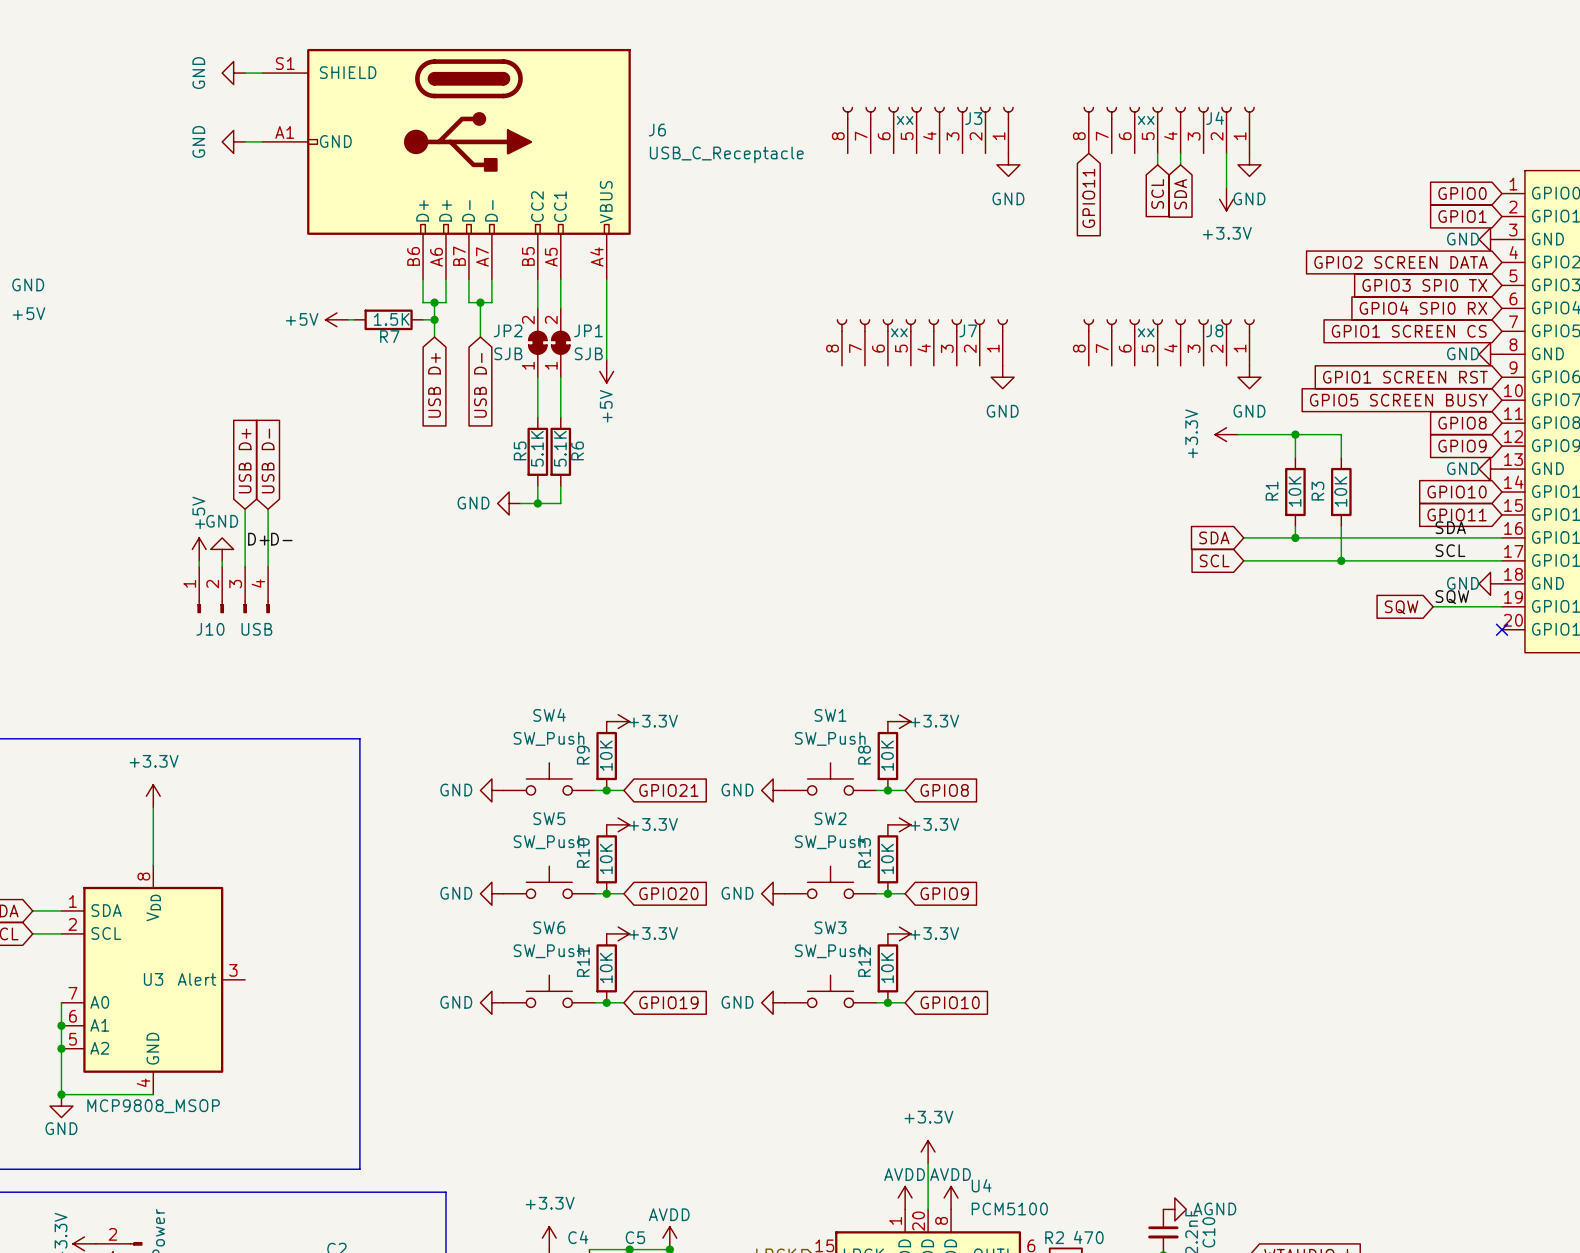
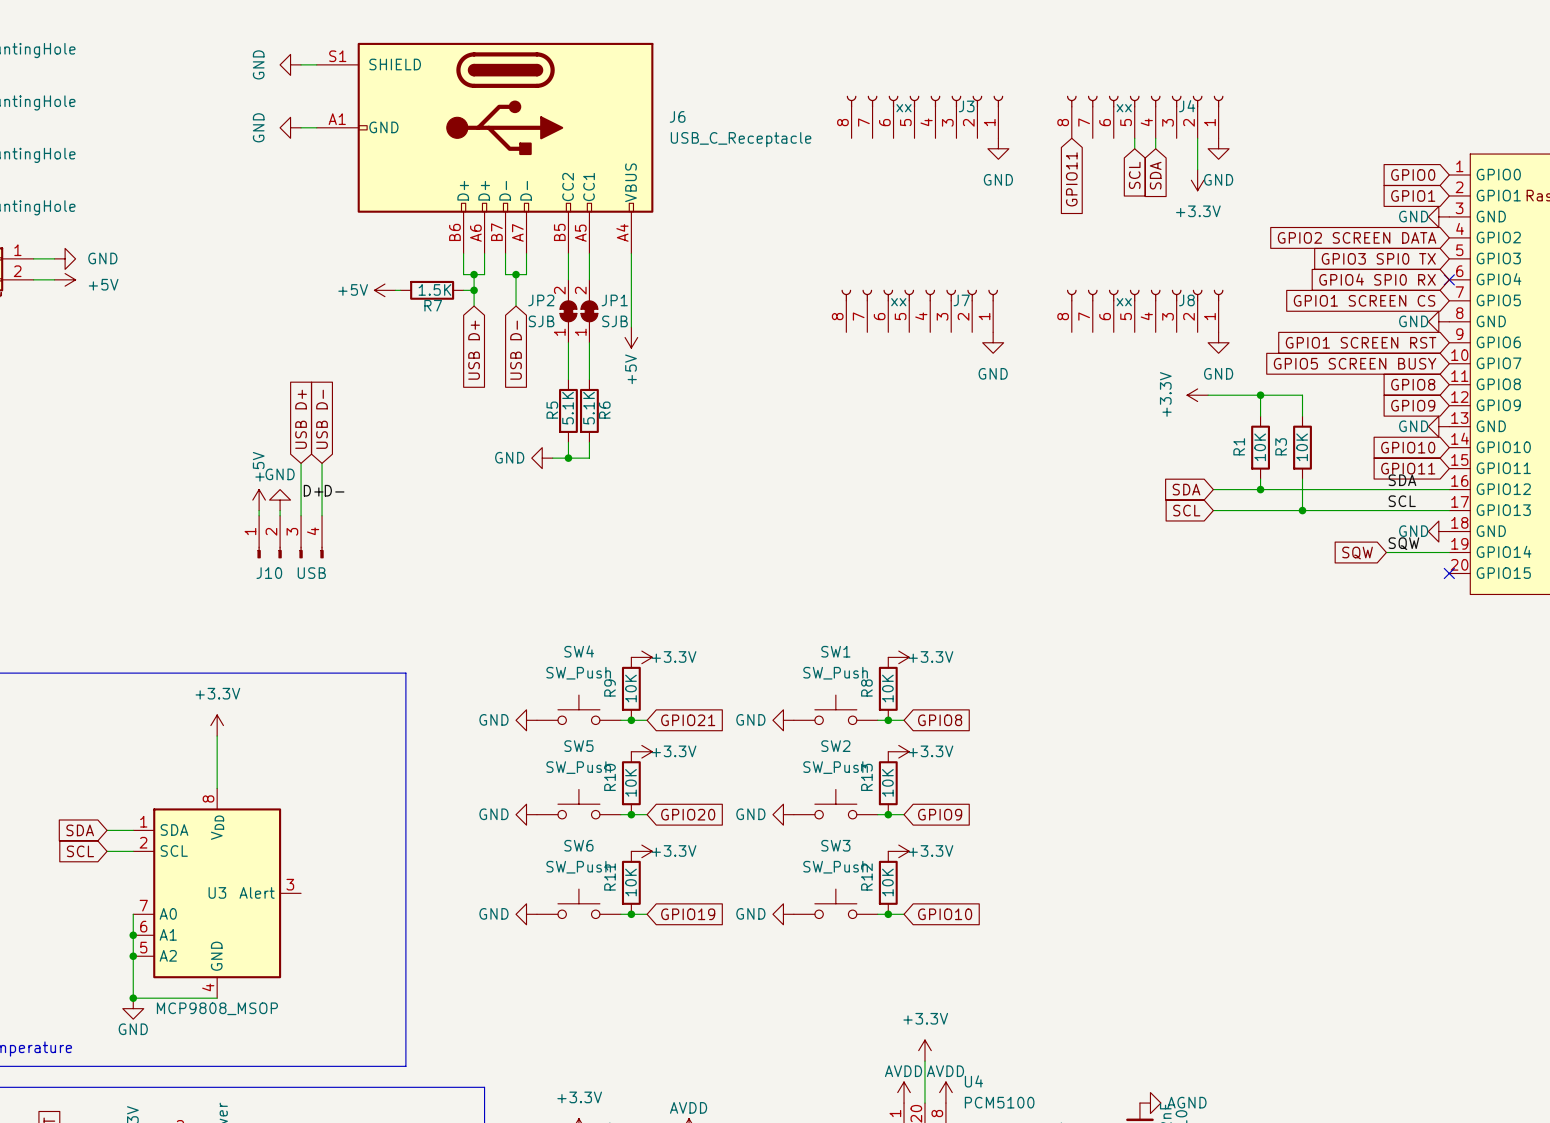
no-connect mark: none -> (1449, 279)

